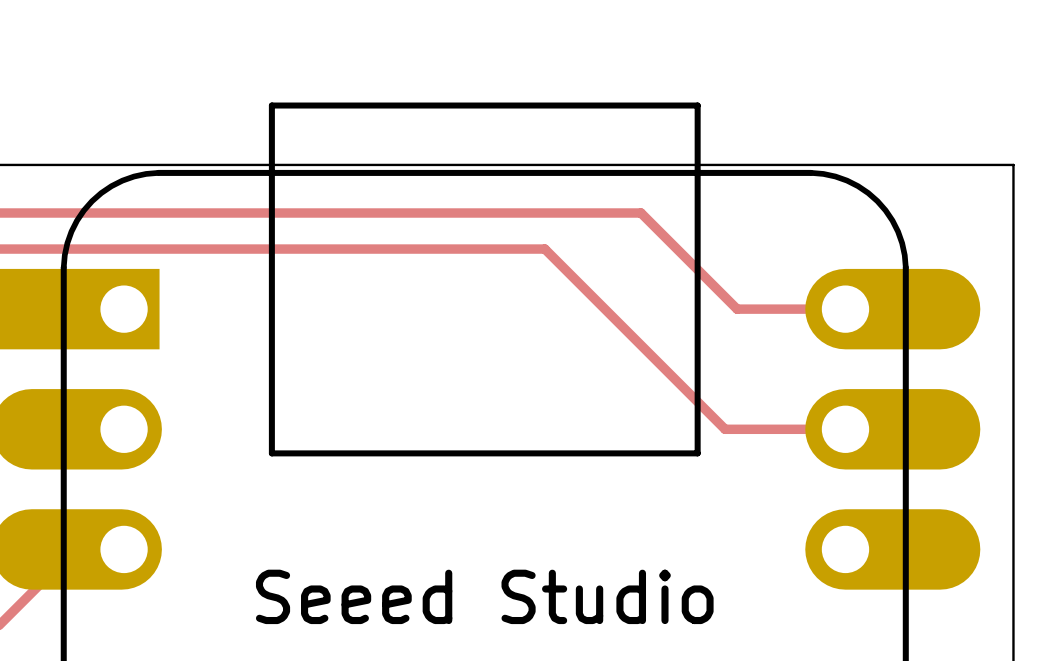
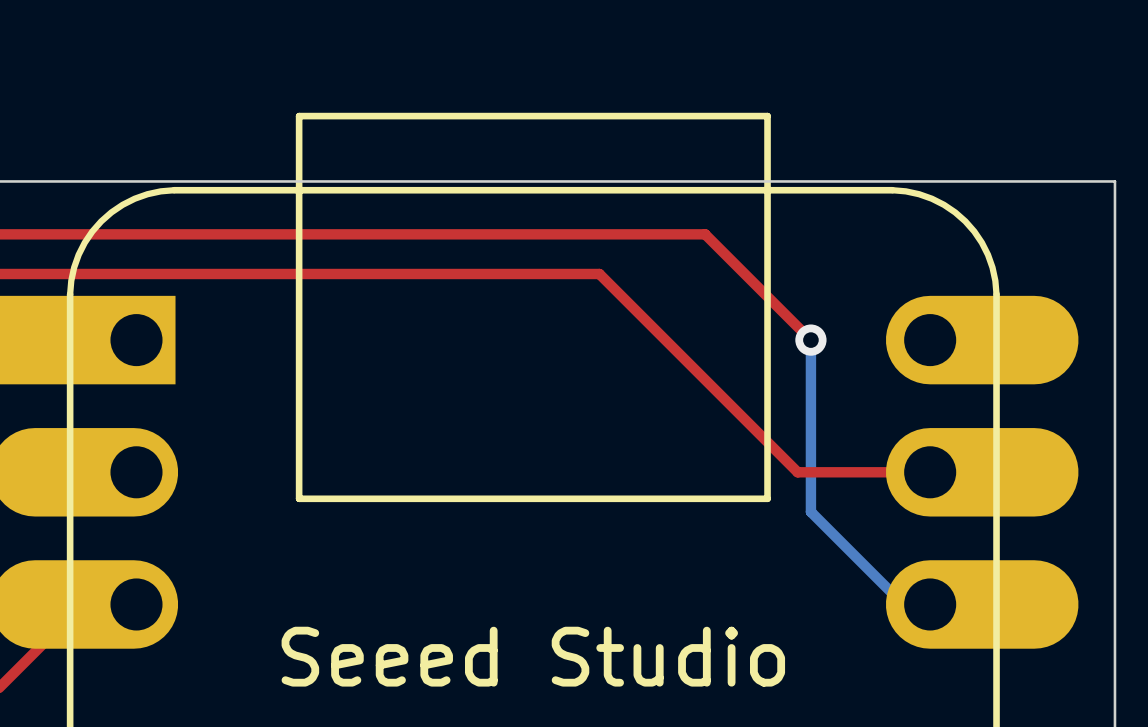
top track: (737, 309) (833, 309) -> none
bottom track: none -> (810, 340) (810, 511) (903, 604) (930, 604)
via: none -> (810, 340)

